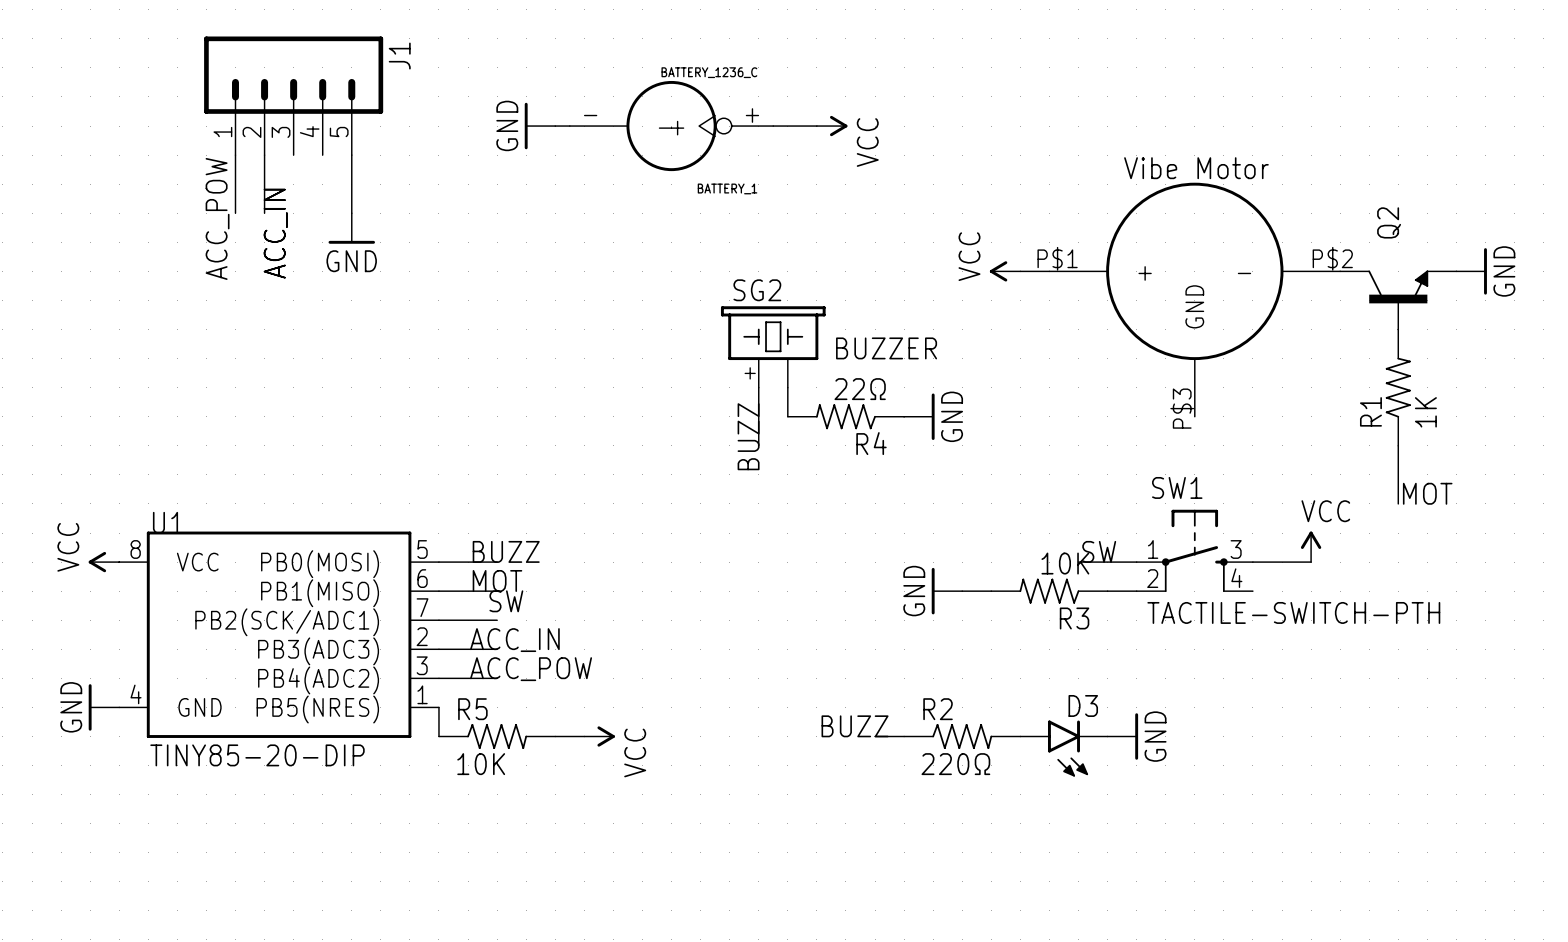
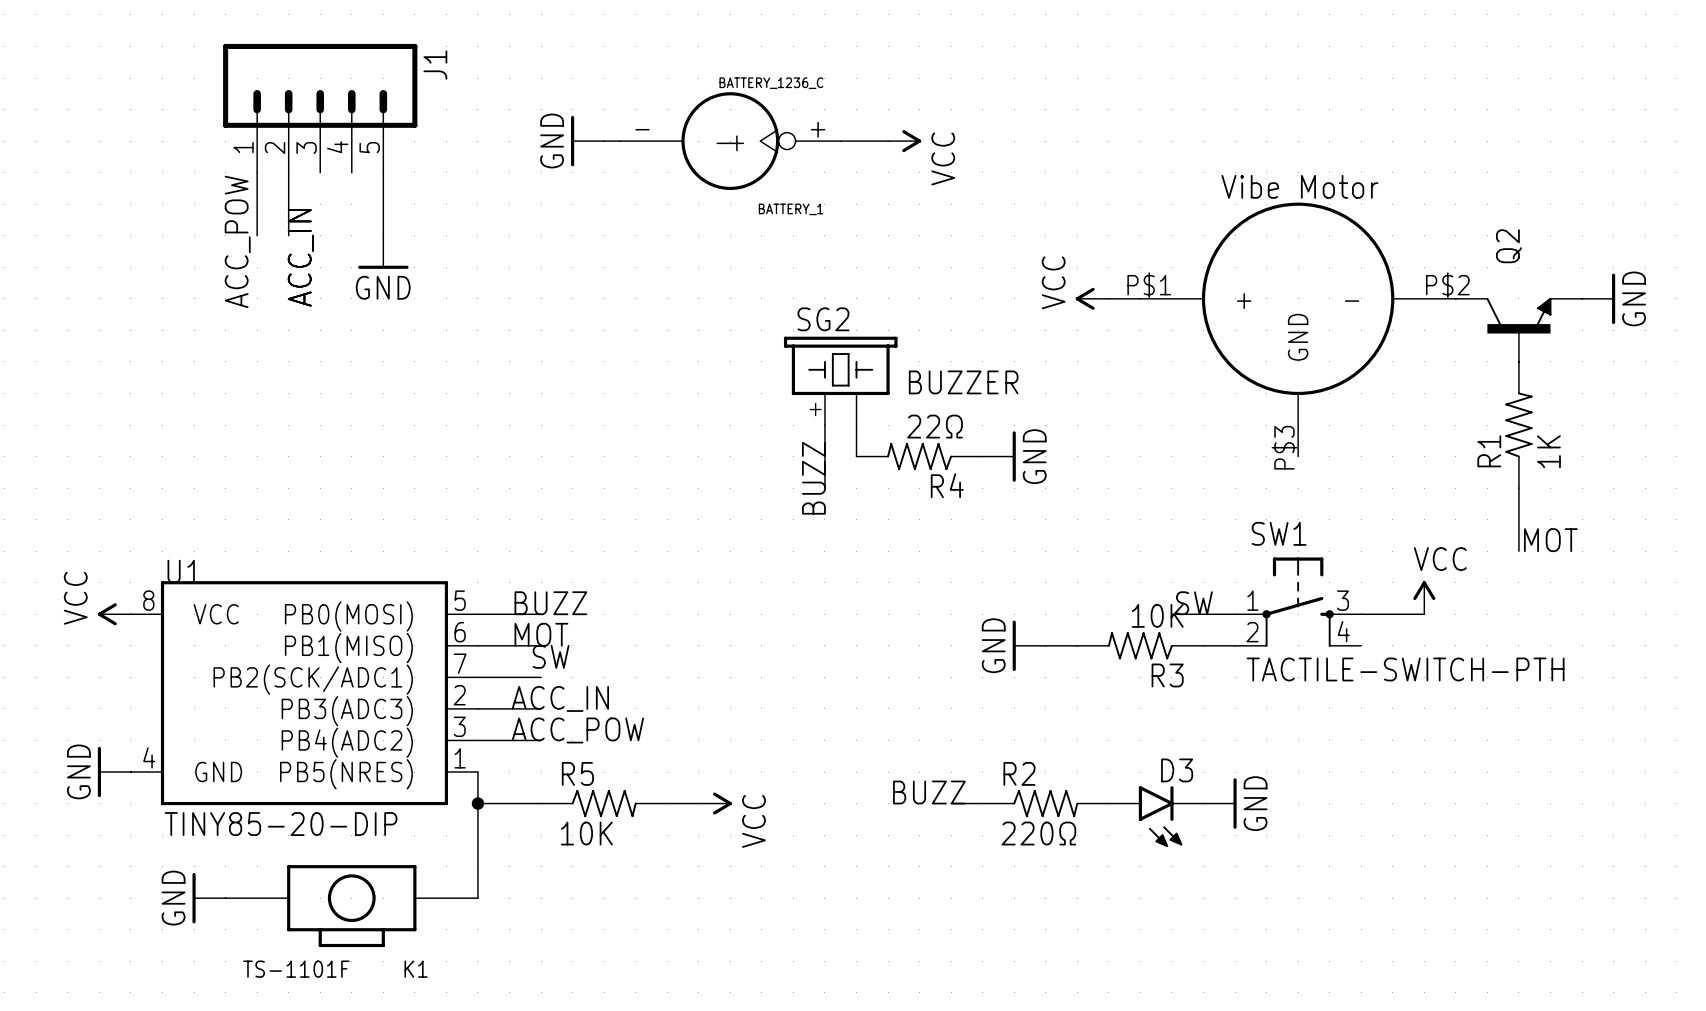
junction: none -> (477, 803)
wire: none -> (541, 803) (477, 803) (477, 898)
R5 position: (497, 736) -> (604, 803)
wire: (555, 736) (584, 736) -> (667, 803) (698, 803)
power symbol position: VCC (599, 736) -> VCC (715, 803)
power symbol: none -> GND (209, 898)
K1: none -> TS-1101F (351, 906)

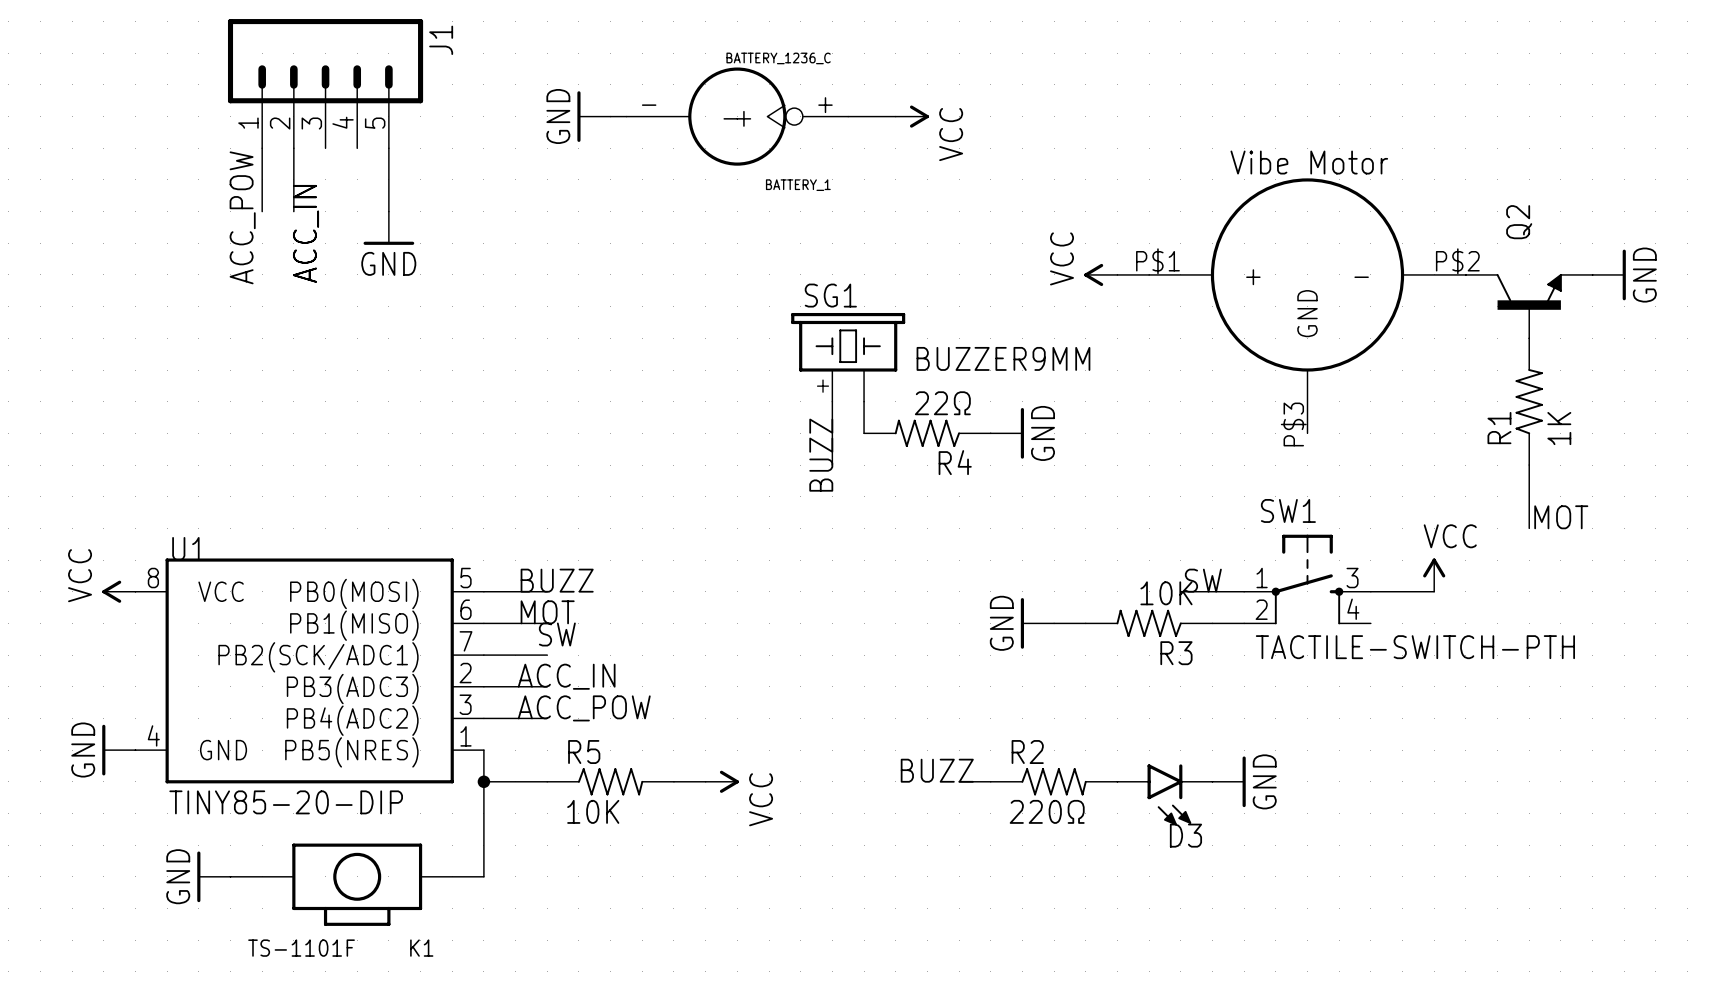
SG2 name: SG2 (823, 319) -> SG1 (830, 295)
SG2 value: BUZZER (963, 382) -> BUZZER9MM (1003, 358)
D3 name position: D3 (1177, 770) -> D3 (1185, 835)

